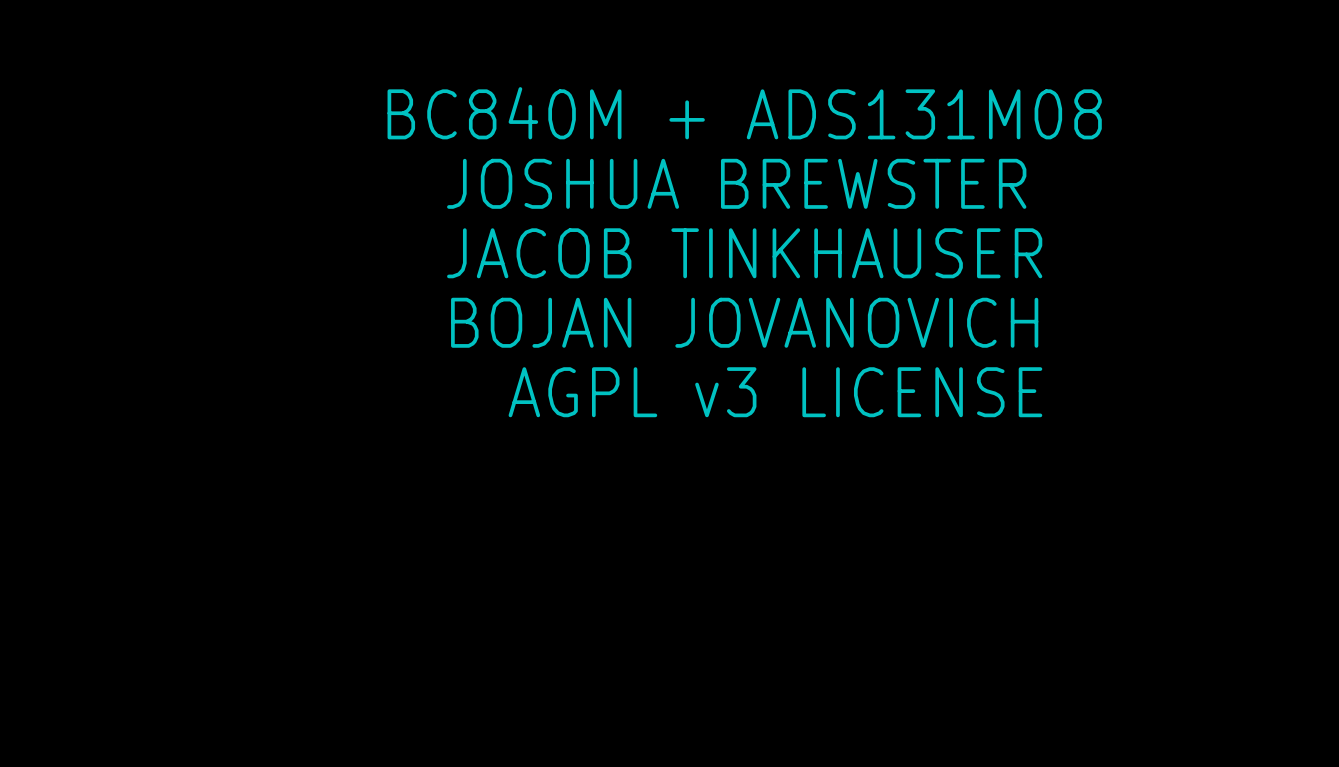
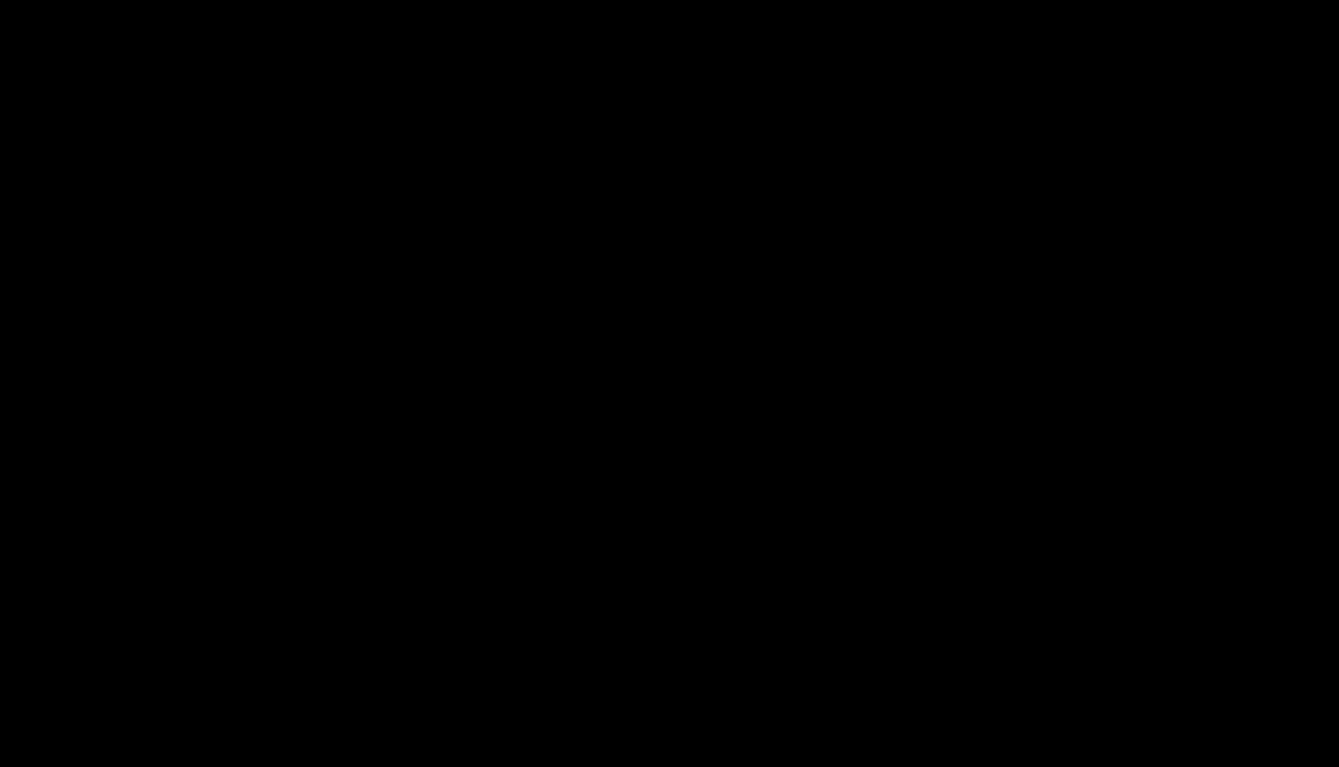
text: BC840M + ADS131M08 (744, 113) -> none
text: JOSHUA BREWSTER (736, 183) -> none
text: JACOB TINKHAUSER (744, 253) -> none
text: BOJAN JOVANOVICH (744, 322) -> none
text: AGPL v3 LICENSE (775, 392) -> none

